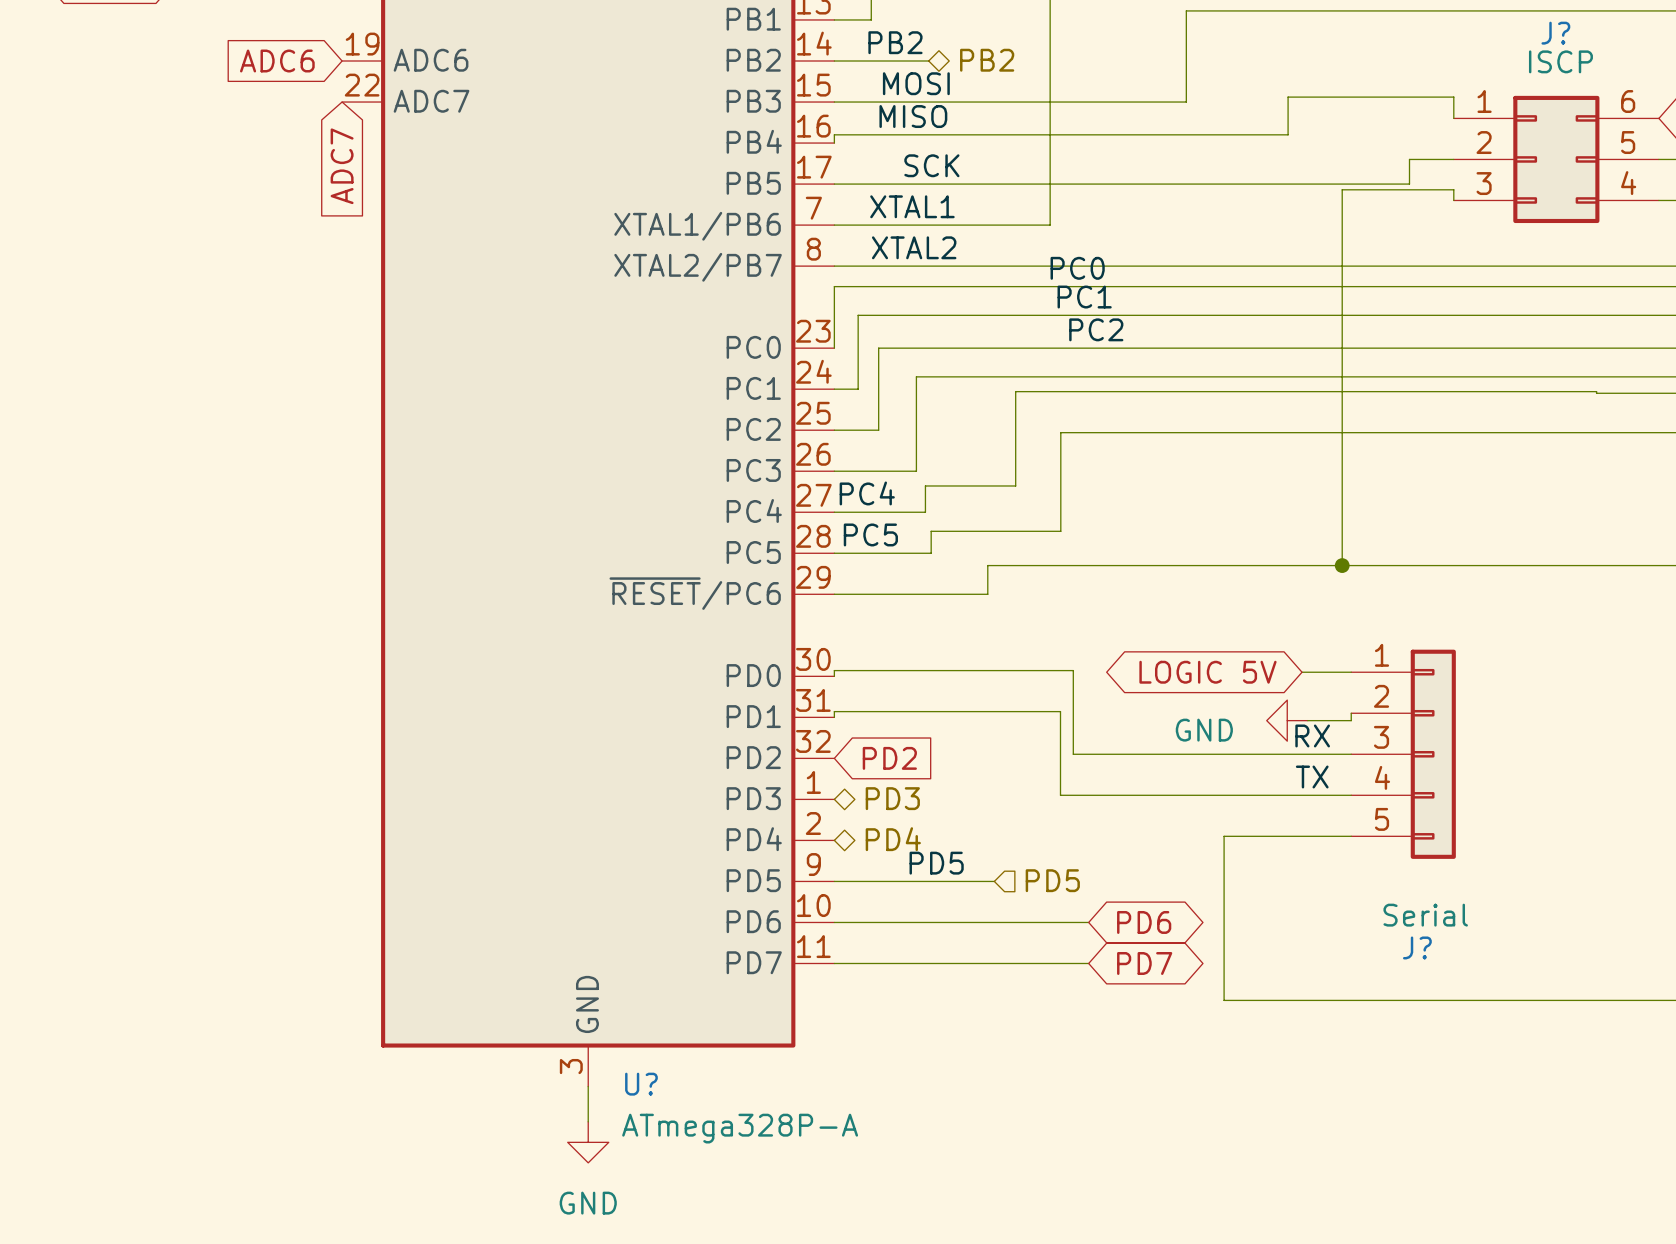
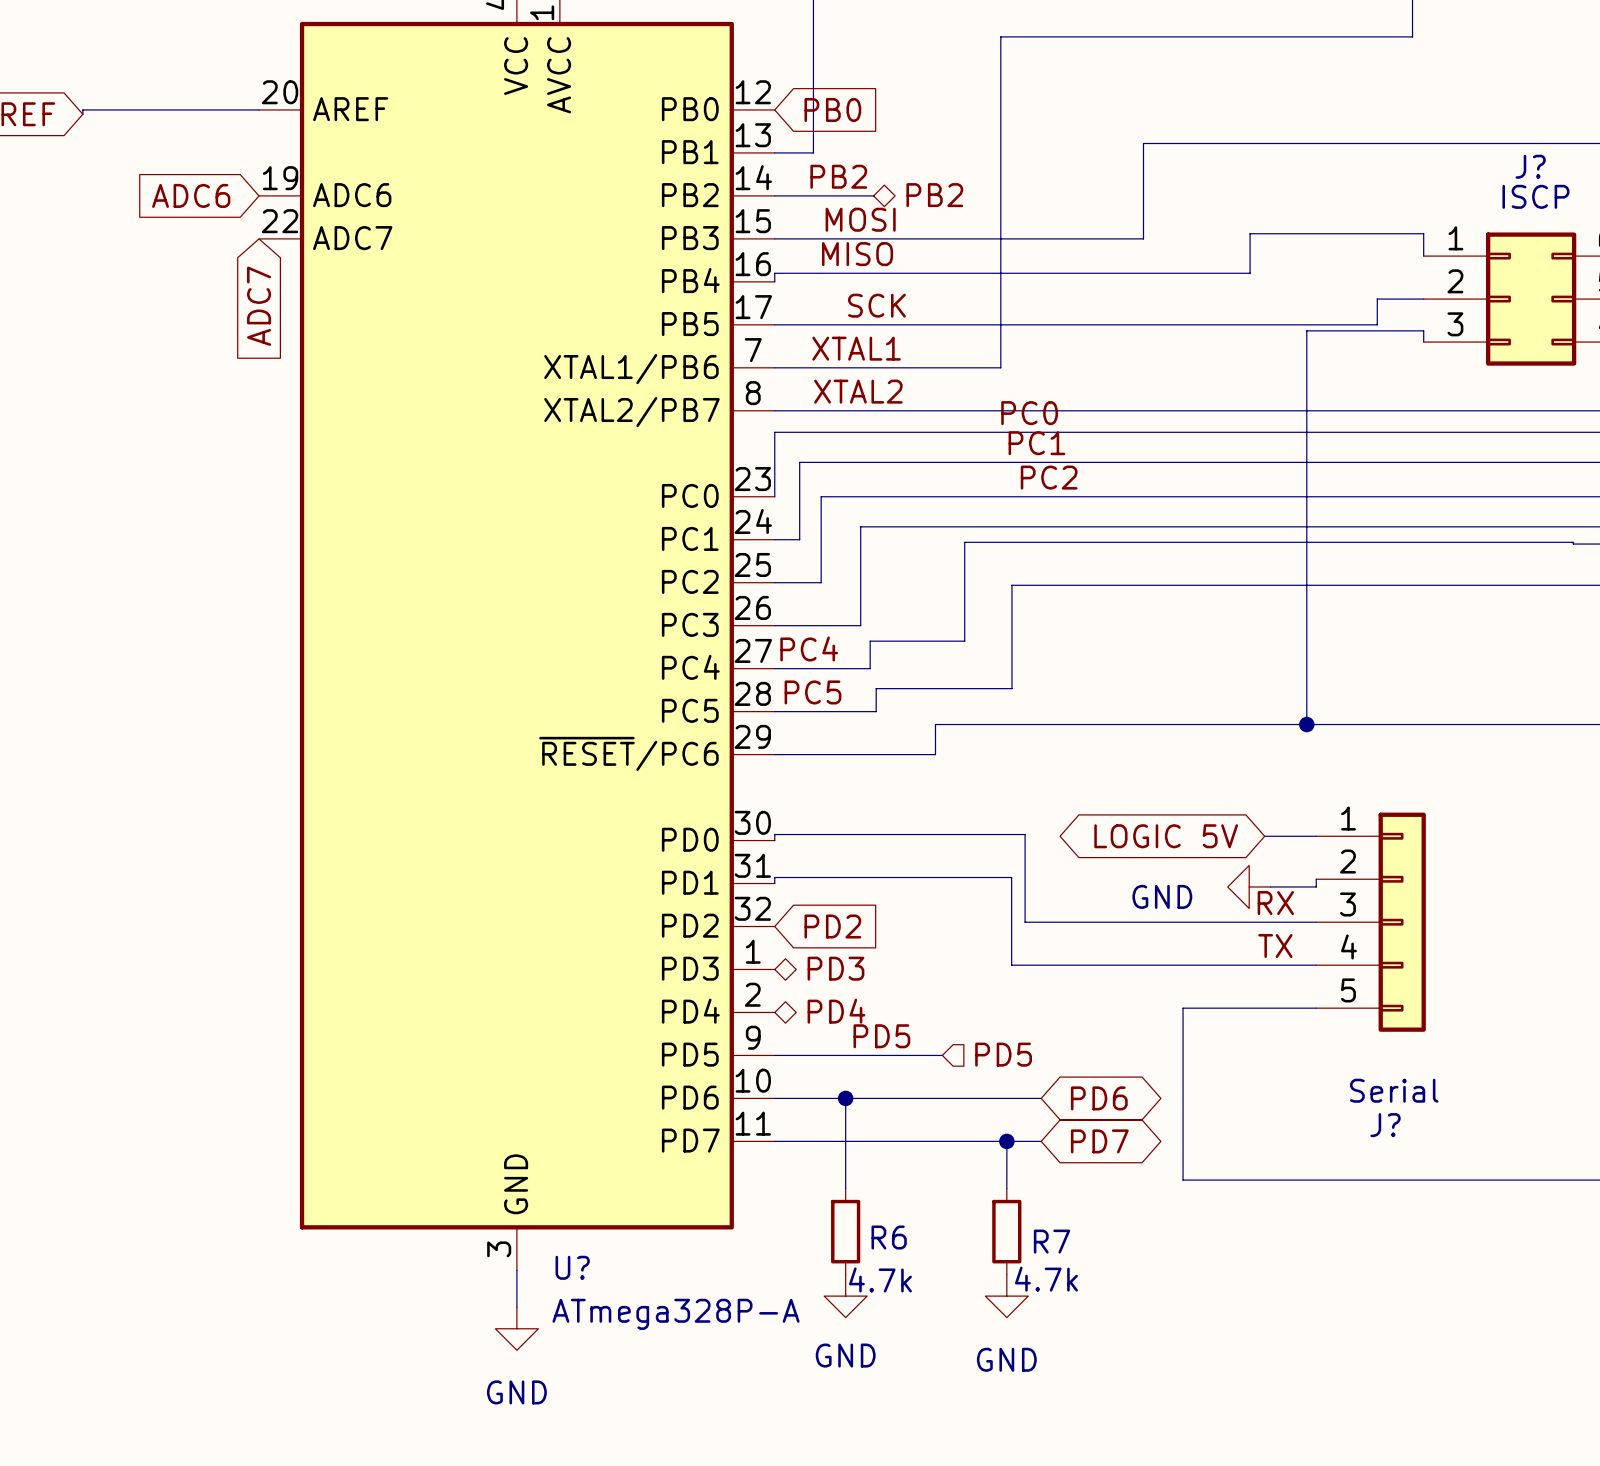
wire: none -> (845, 1098) (845, 1188)
junction: none -> (845, 1098)
wire: none -> (1006, 1141) (1006, 1188)
junction: none -> (1006, 1141)
R6: none -> 4.7k (845, 1231)
R7: none -> 4.7k (1006, 1231)
power symbol: none -> GND (845, 1296)
power symbol: none -> GND (1006, 1296)

